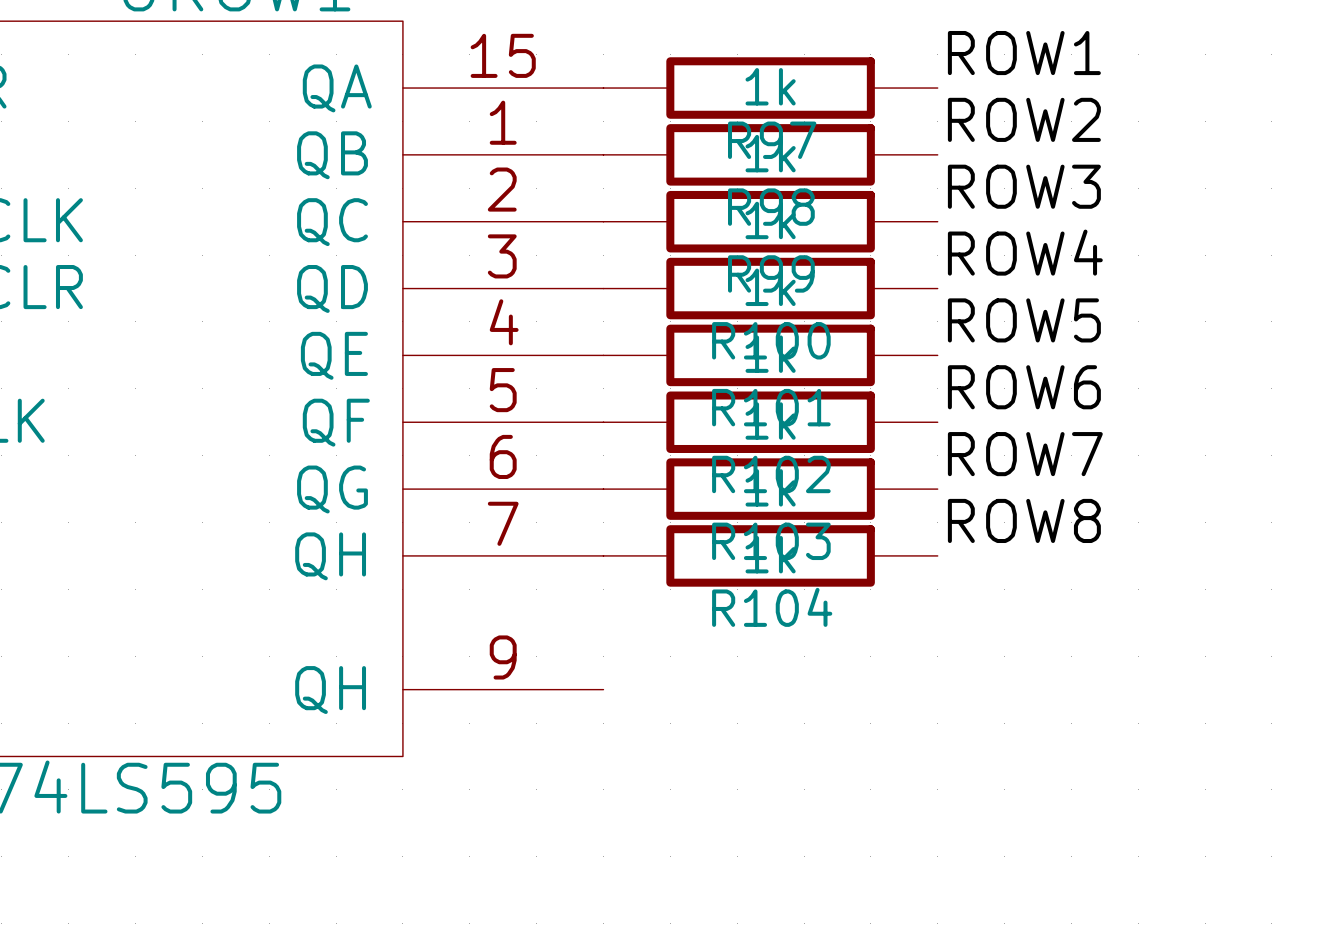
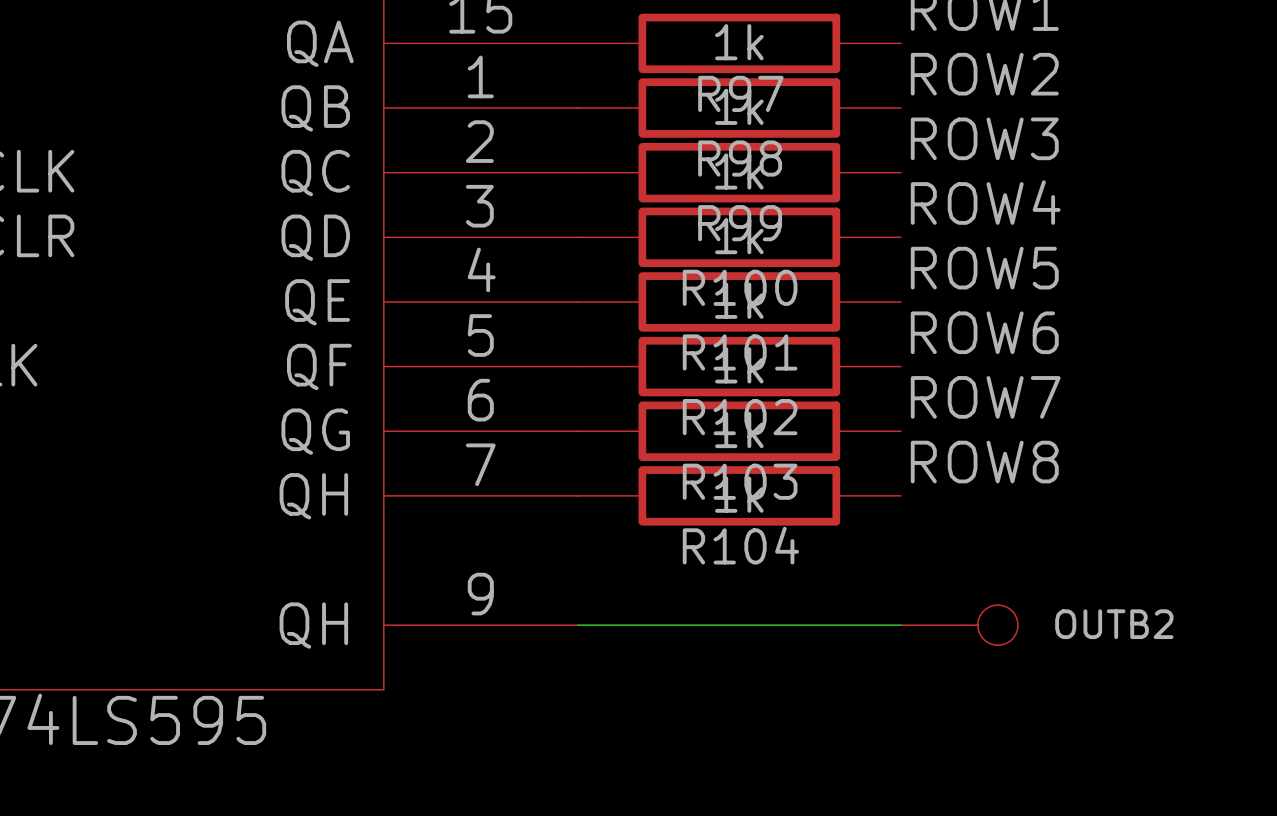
wire: none -> (577, 625) (900, 625)
OUTB2: none -> (959, 625)

